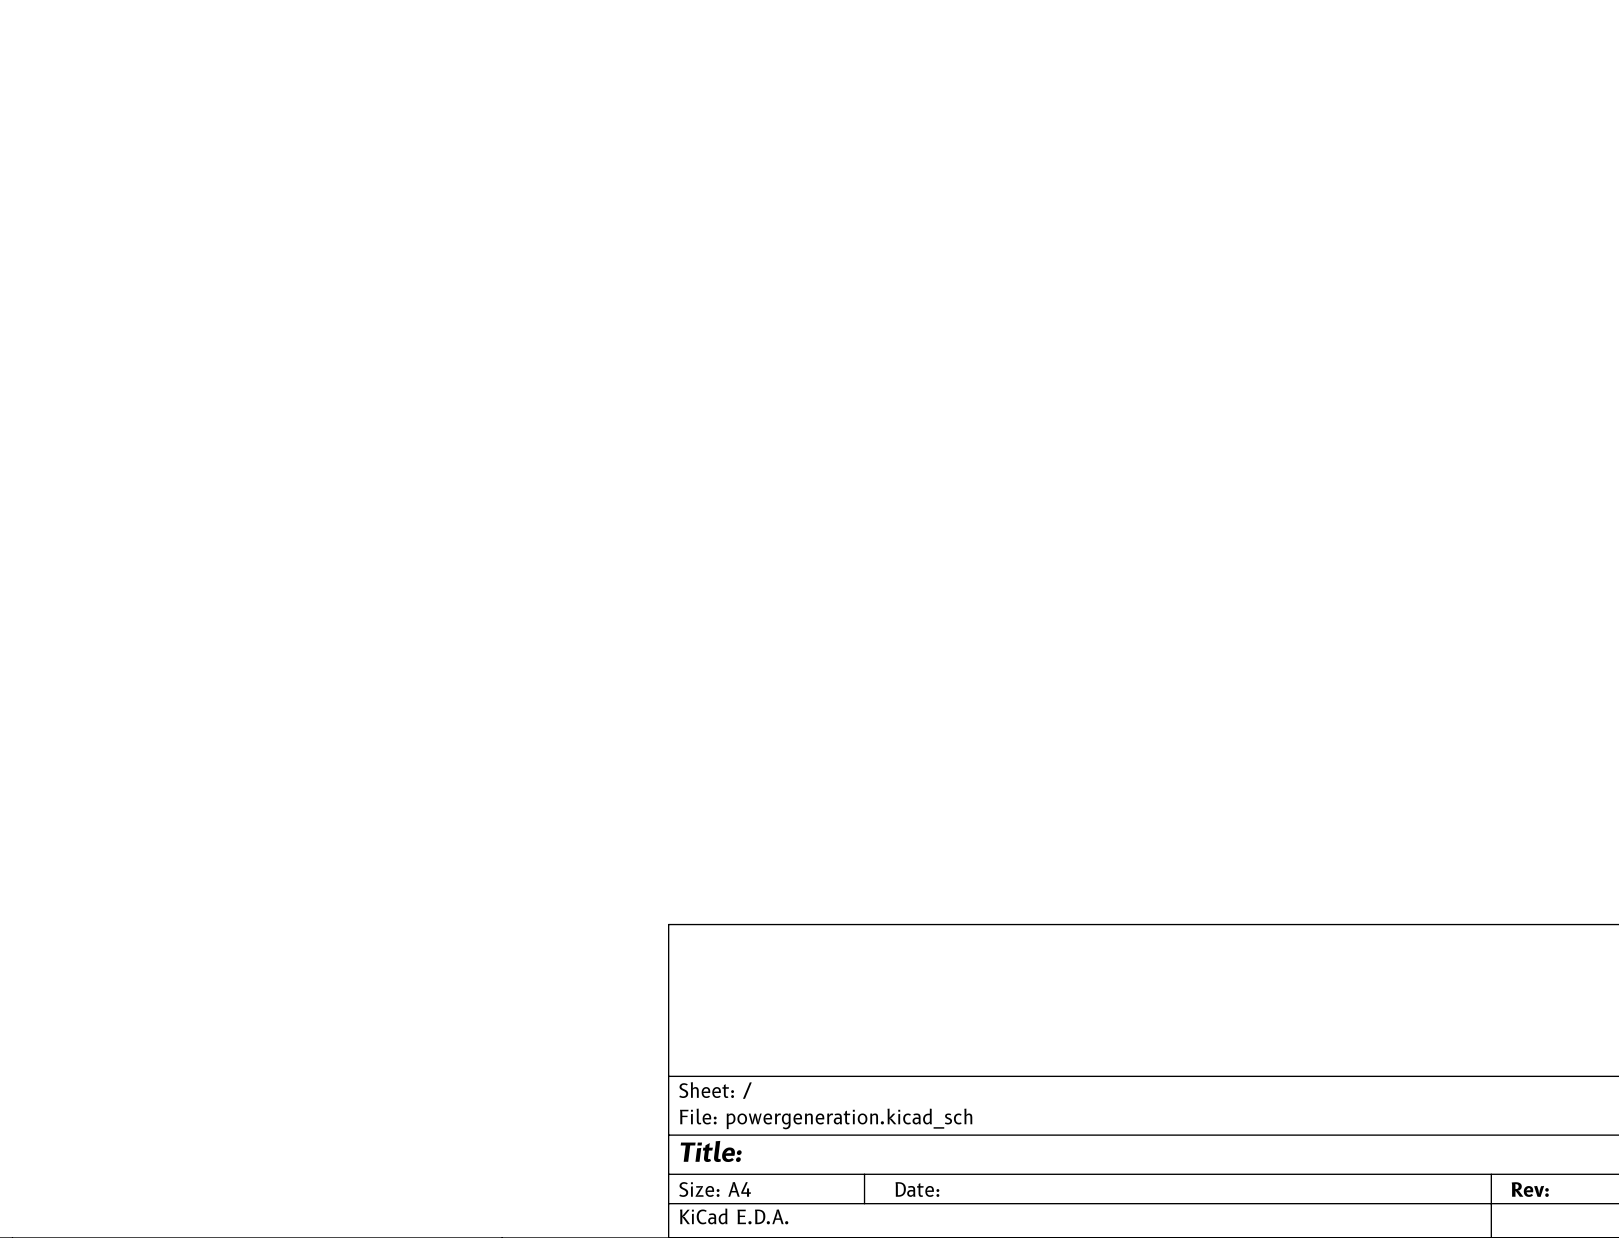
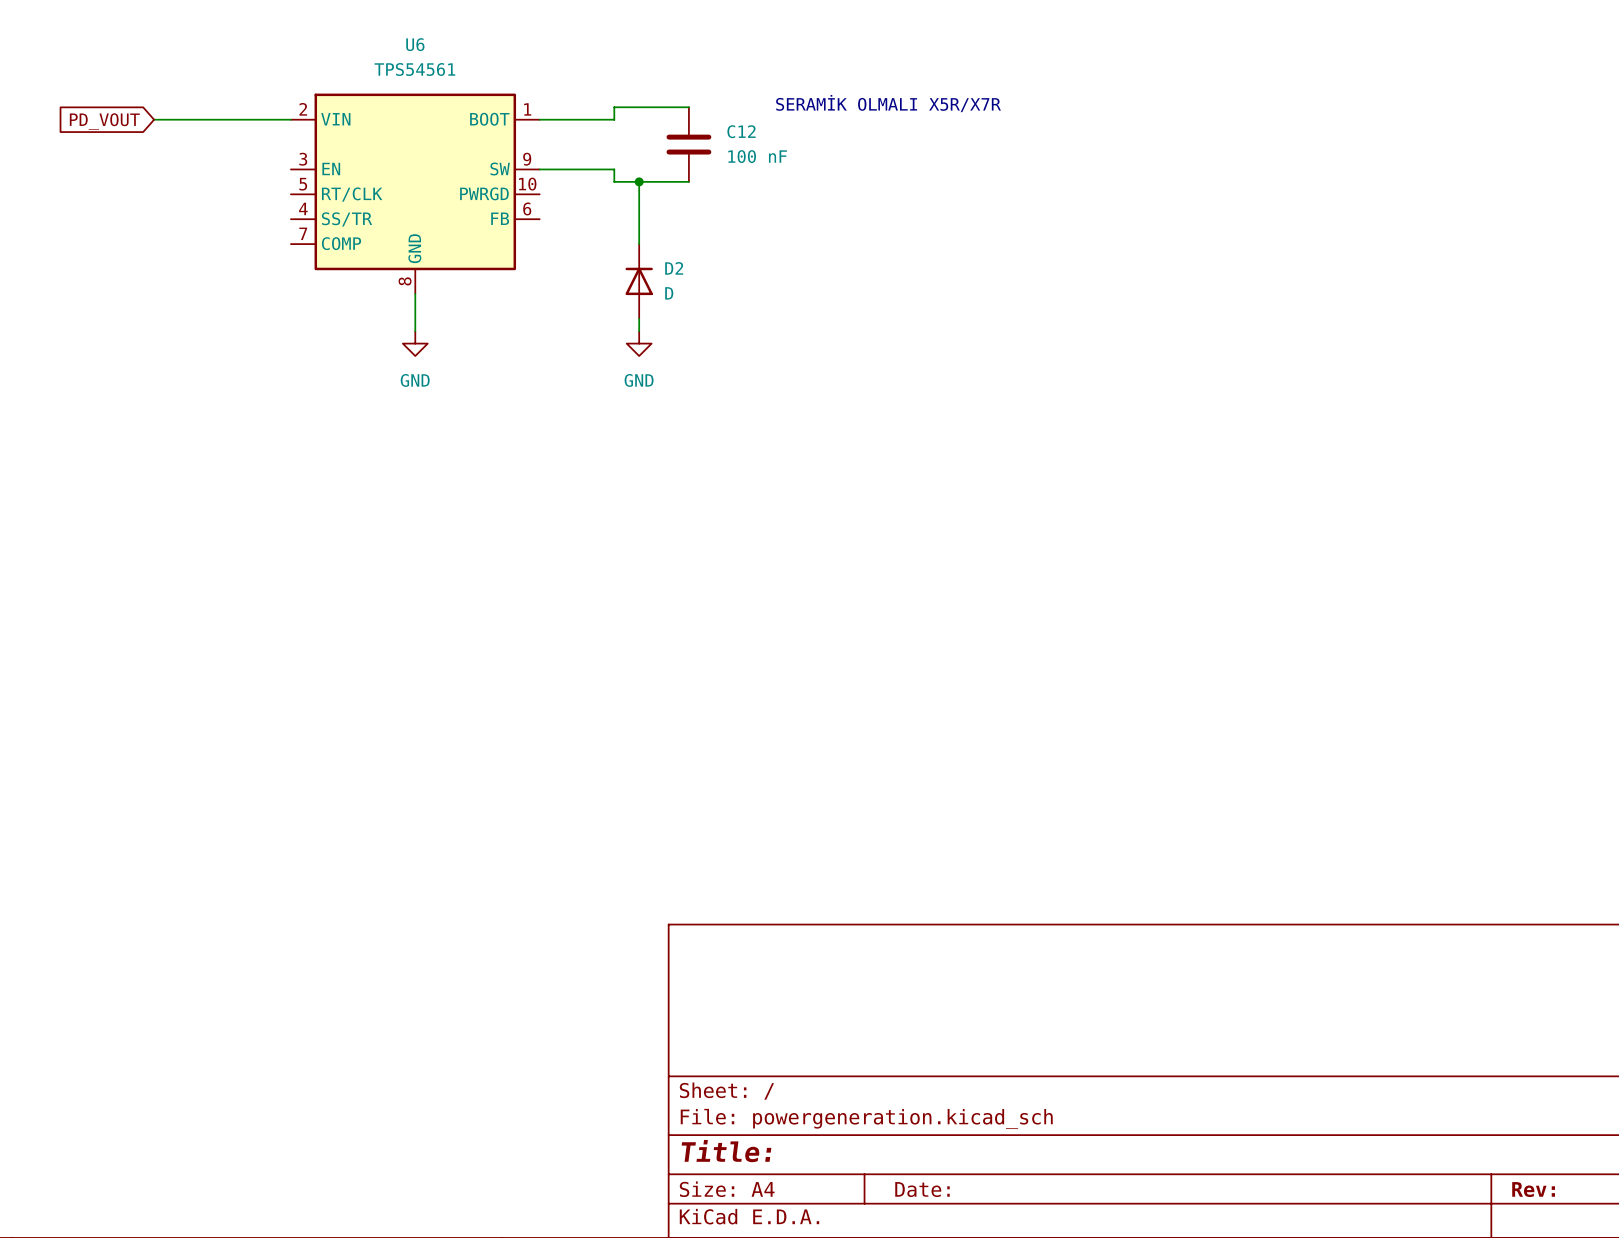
text: none -> SERAMİK OLMALI X5R/X7R (888, 103)
wire: none -> (688, 107) (614, 107) (614, 119) (539, 119)
wire: none -> (154, 119) (290, 119)
global label: none -> PD_VOUT (104, 121)
C12: none -> 100 nF (688, 144)
wire: none -> (539, 169) (614, 169) (614, 181) (688, 181)
wire: none -> (639, 181) (639, 244)
junction: none -> (639, 181)
U6: none -> TPS54561 (415, 193)
D2: none -> D (639, 281)
wire: none -> (415, 293) (415, 331)
wire: none -> (639, 318) (639, 331)
power symbol: none -> GND (415, 343)
power symbol: none -> GND (639, 343)

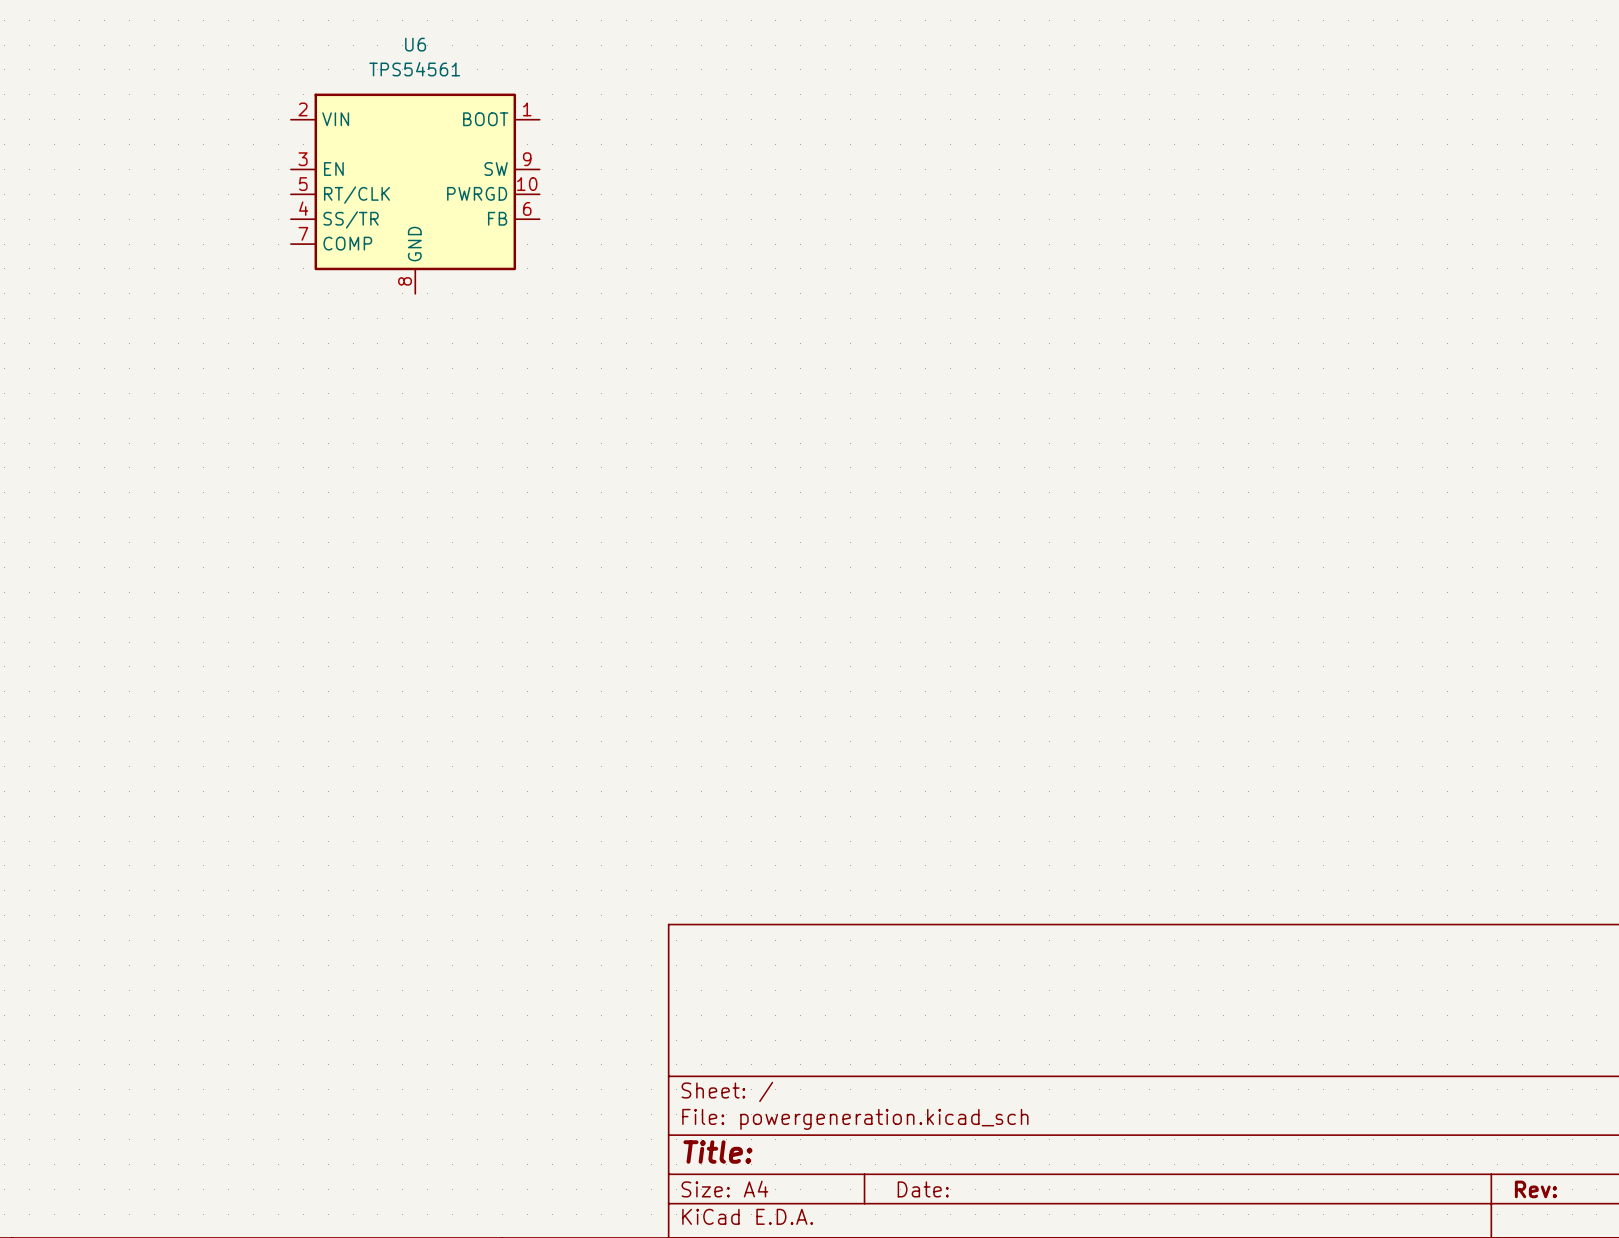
text: SERAMİK OLMALI X5R/X7R (888, 103) -> none
wire: (688, 107) (614, 107) (614, 119) (539, 119) -> none
wire: (154, 119) (290, 119) -> none
global label: PD_VOUT (104, 121) -> none
C12: 100 nF (688, 144) -> none
wire: (539, 169) (614, 169) (614, 181) (688, 181) -> none
wire: (639, 181) (639, 244) -> none
junction: (639, 181) -> none
D2: D (639, 281) -> none
wire: (415, 293) (415, 331) -> none
wire: (639, 318) (639, 331) -> none
power symbol: GND (415, 343) -> none
power symbol: GND (639, 343) -> none

